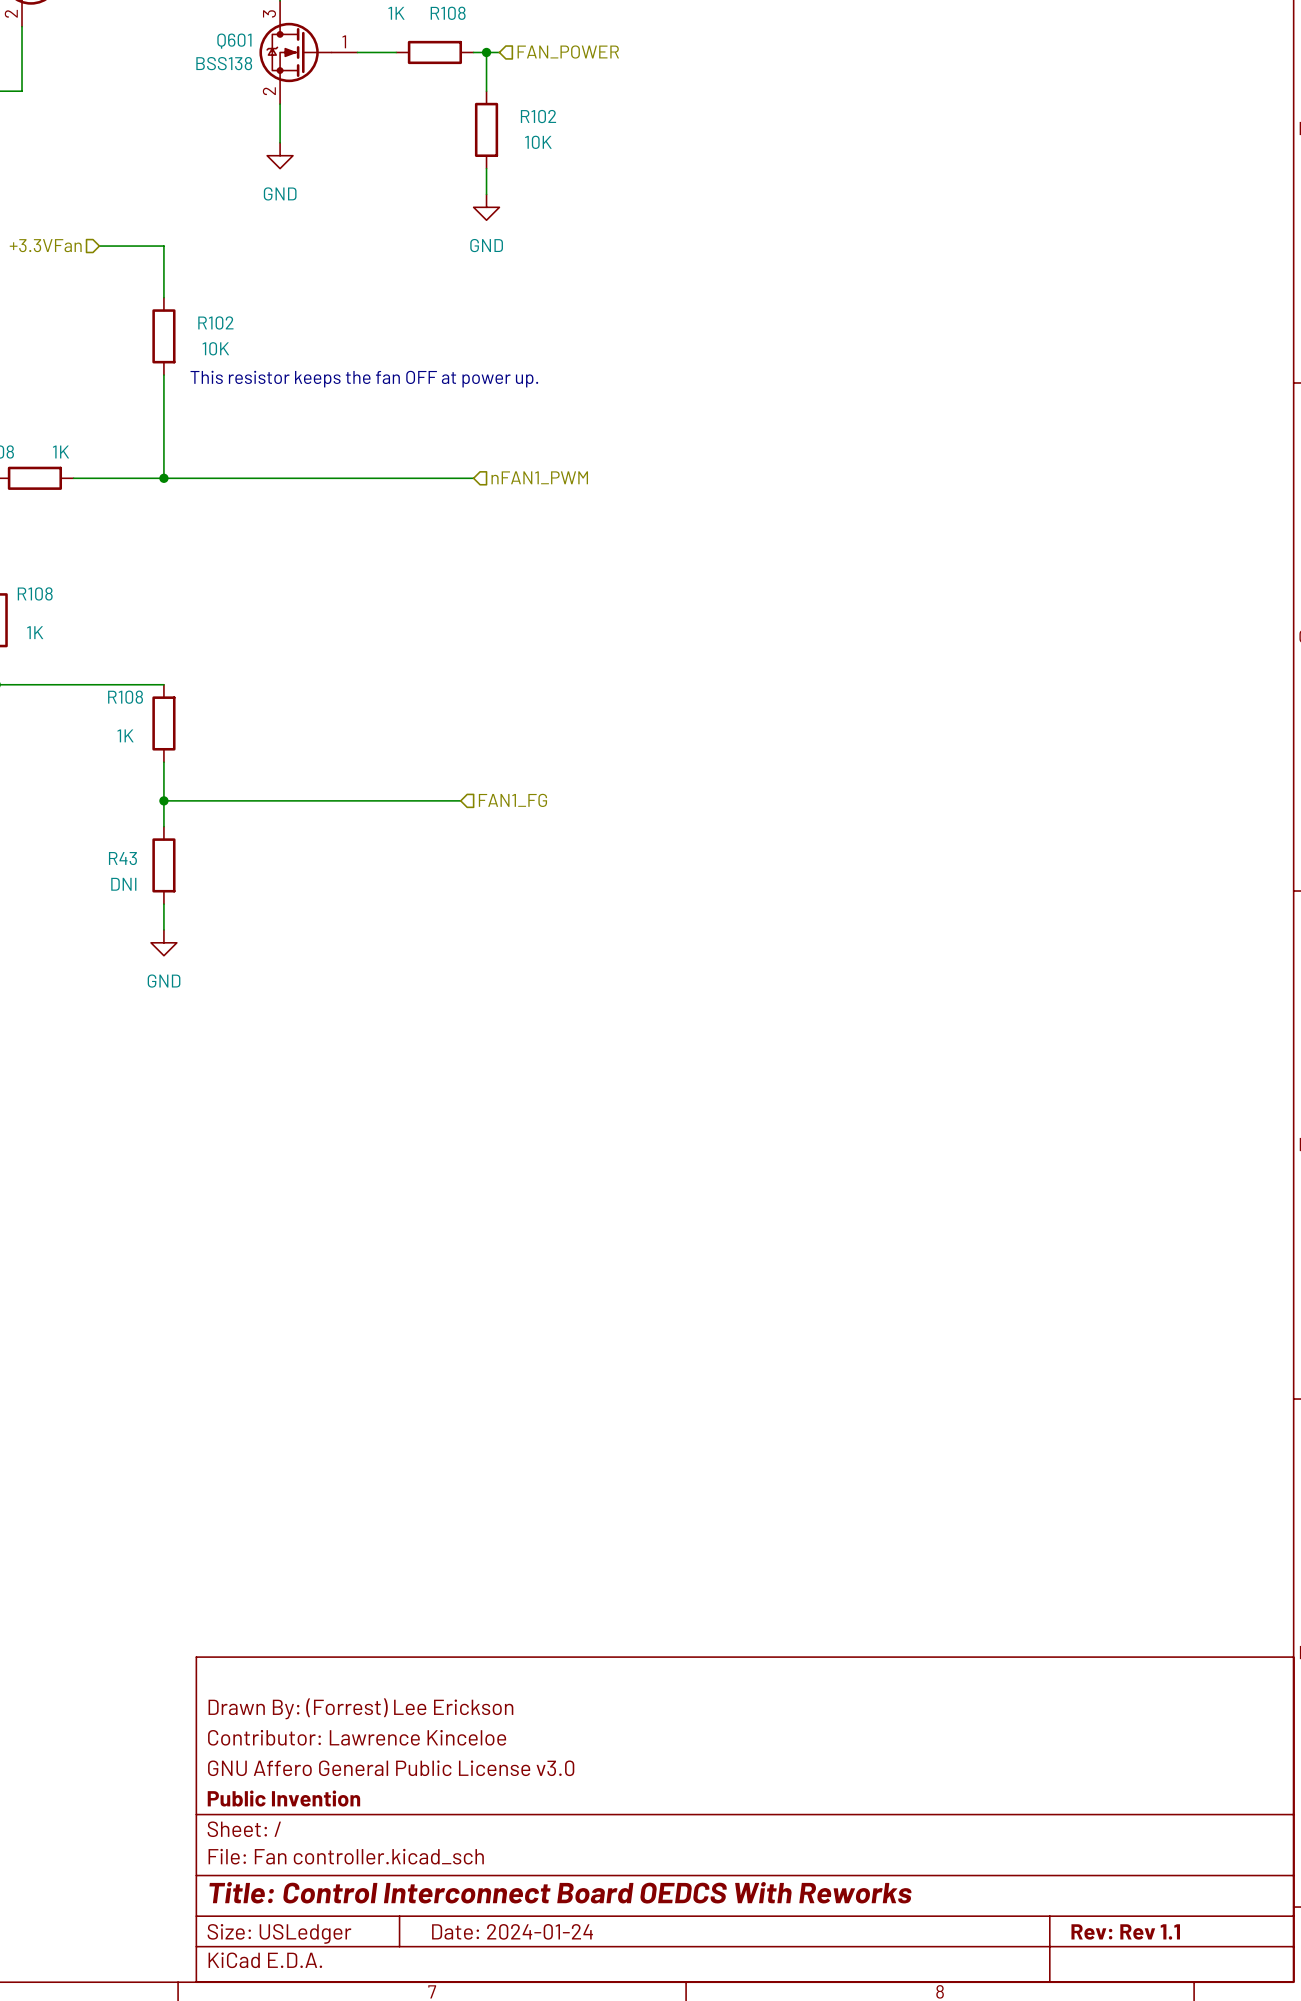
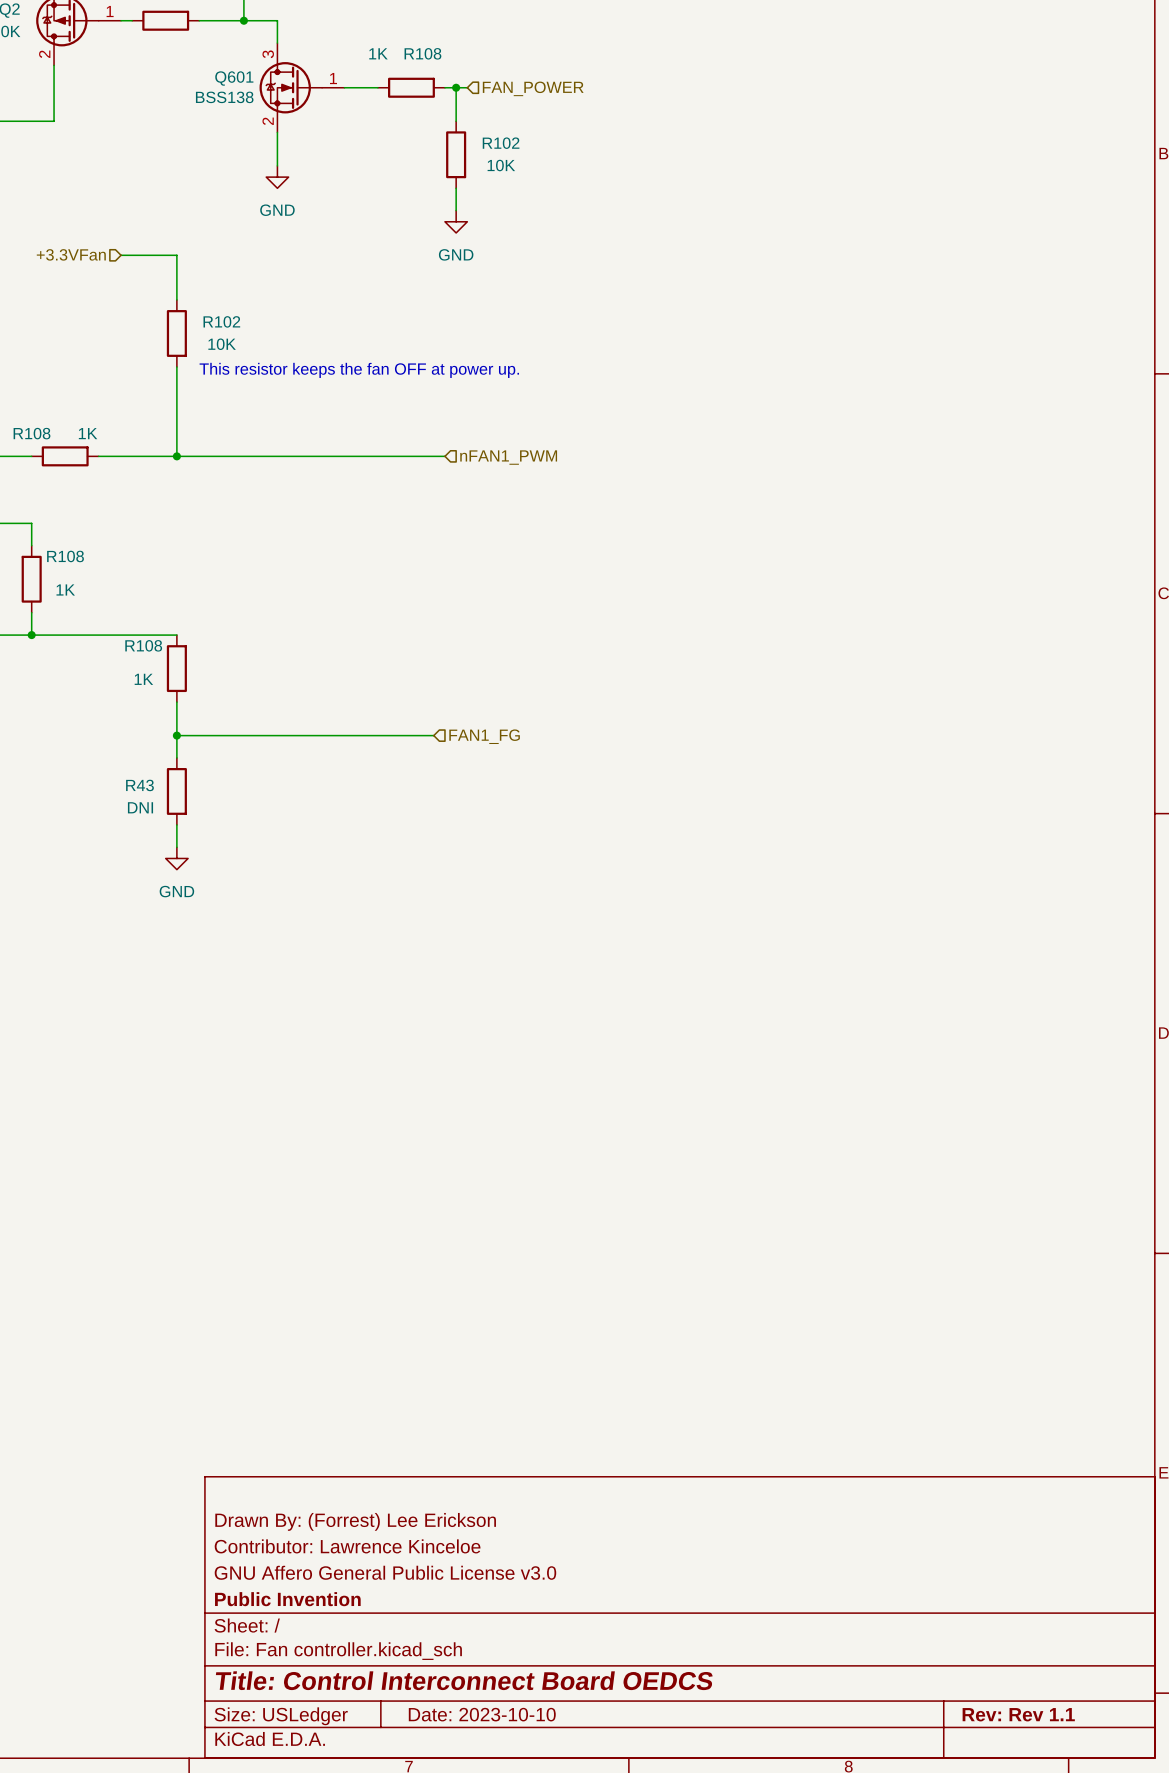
title block: Title: Control Interconnect Board OEDCS With Reworks (560, 1892) -> Title: Control Interconnect Board OEDCS (464, 1680)
title block: Date: 2024-01-24 (512, 1931) -> Date: 2023-10-10 (482, 1714)

